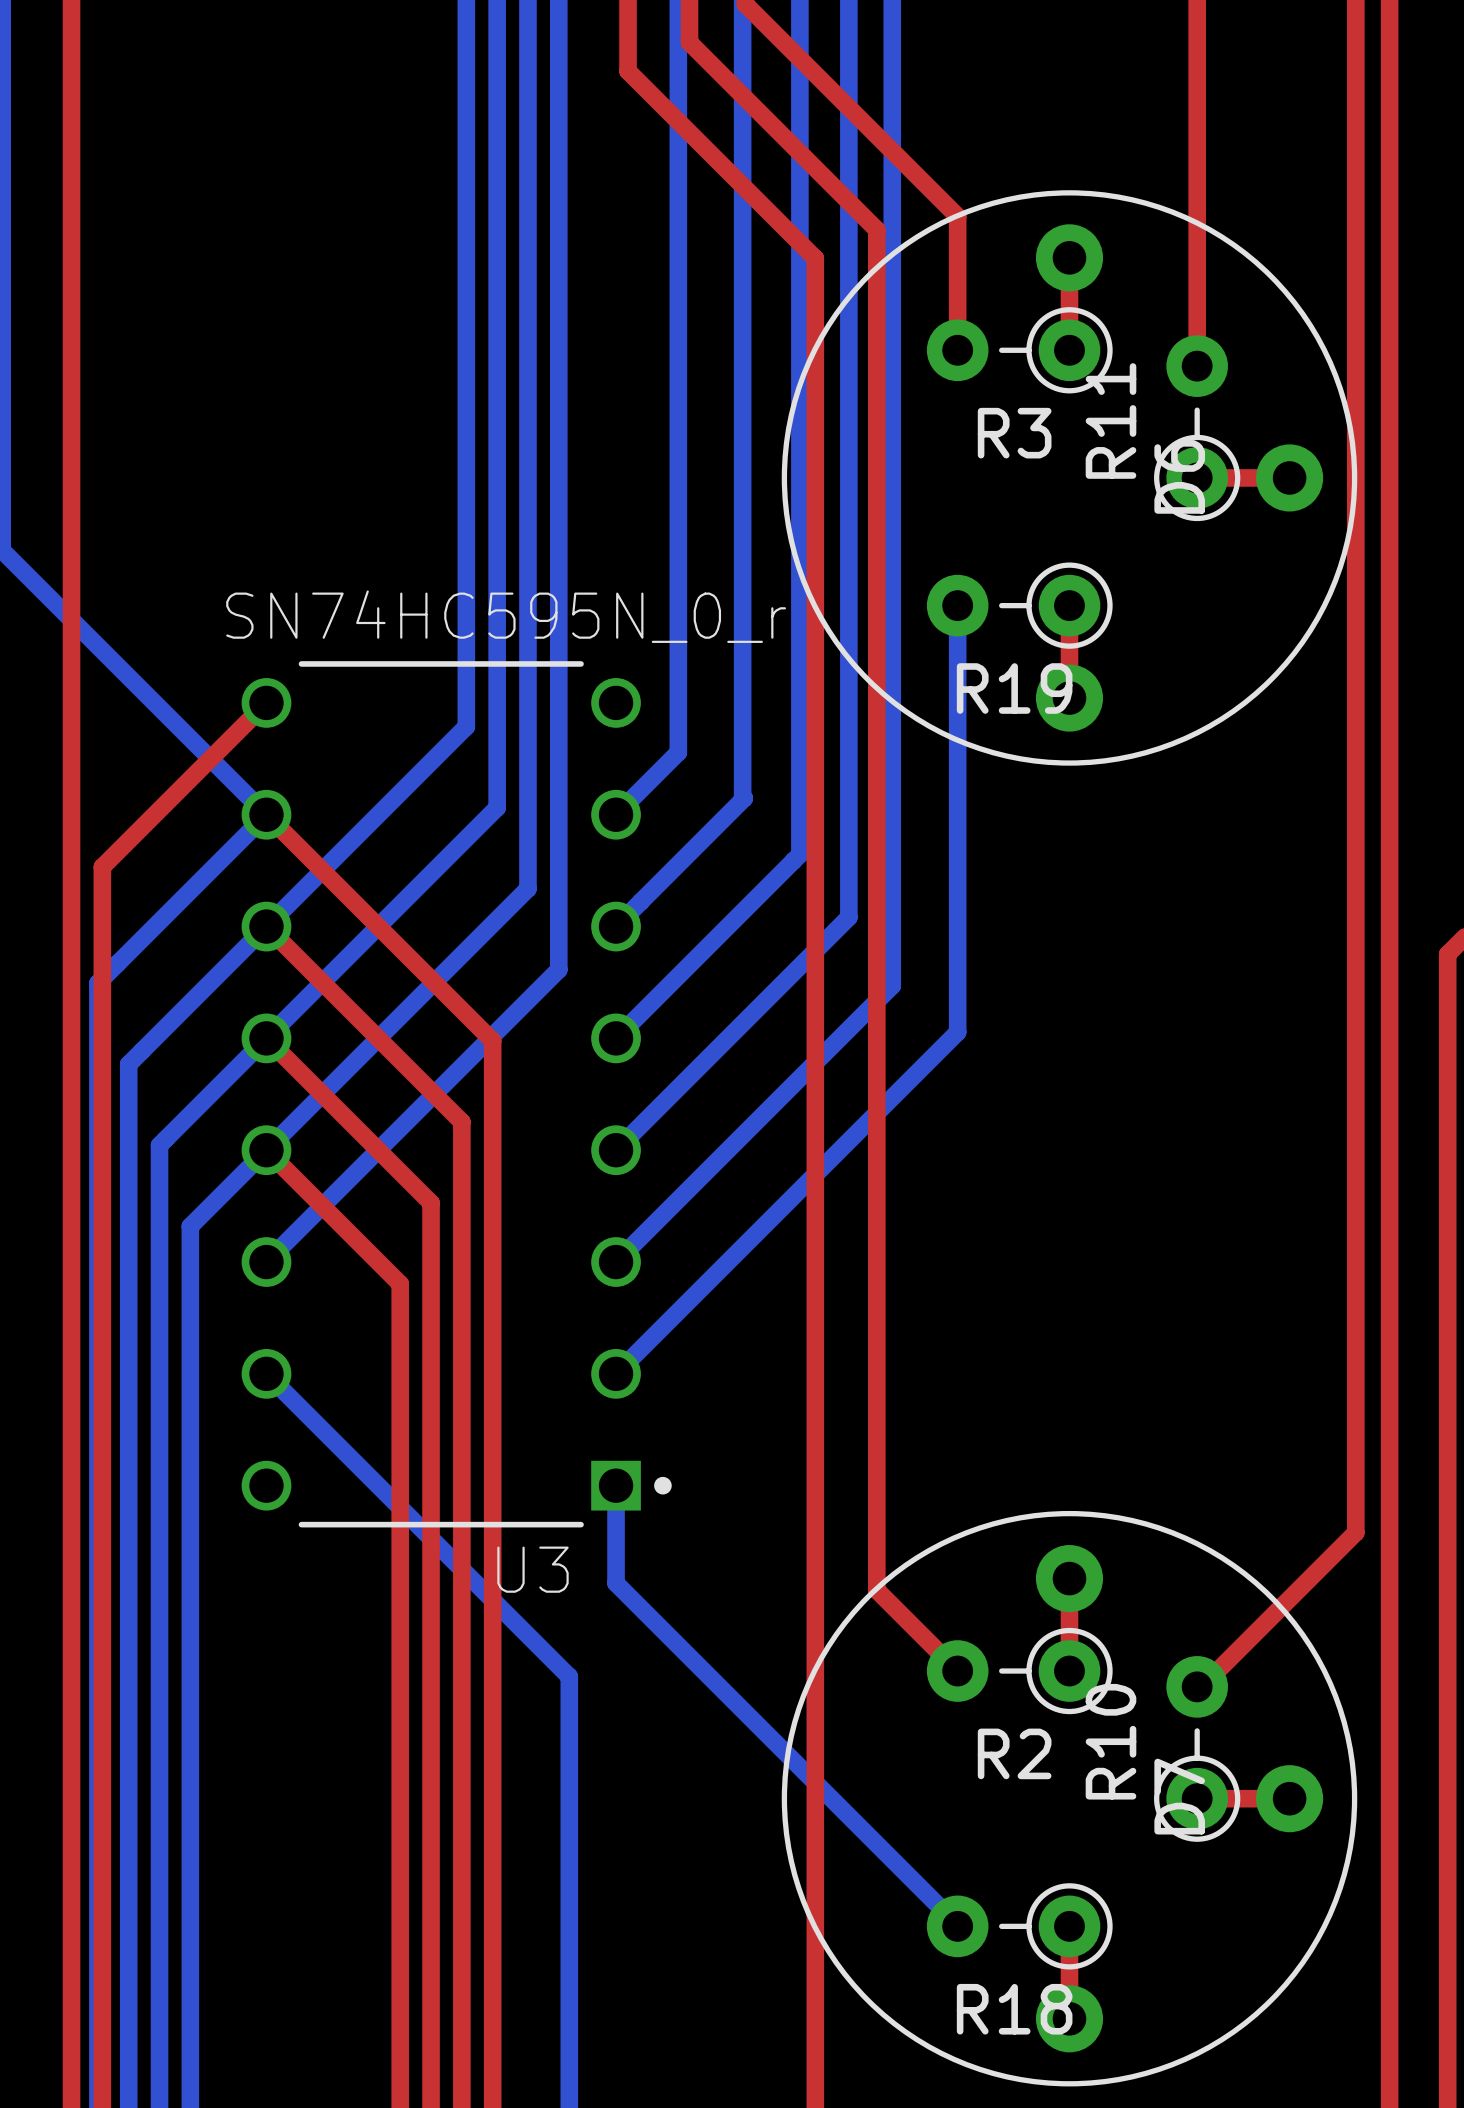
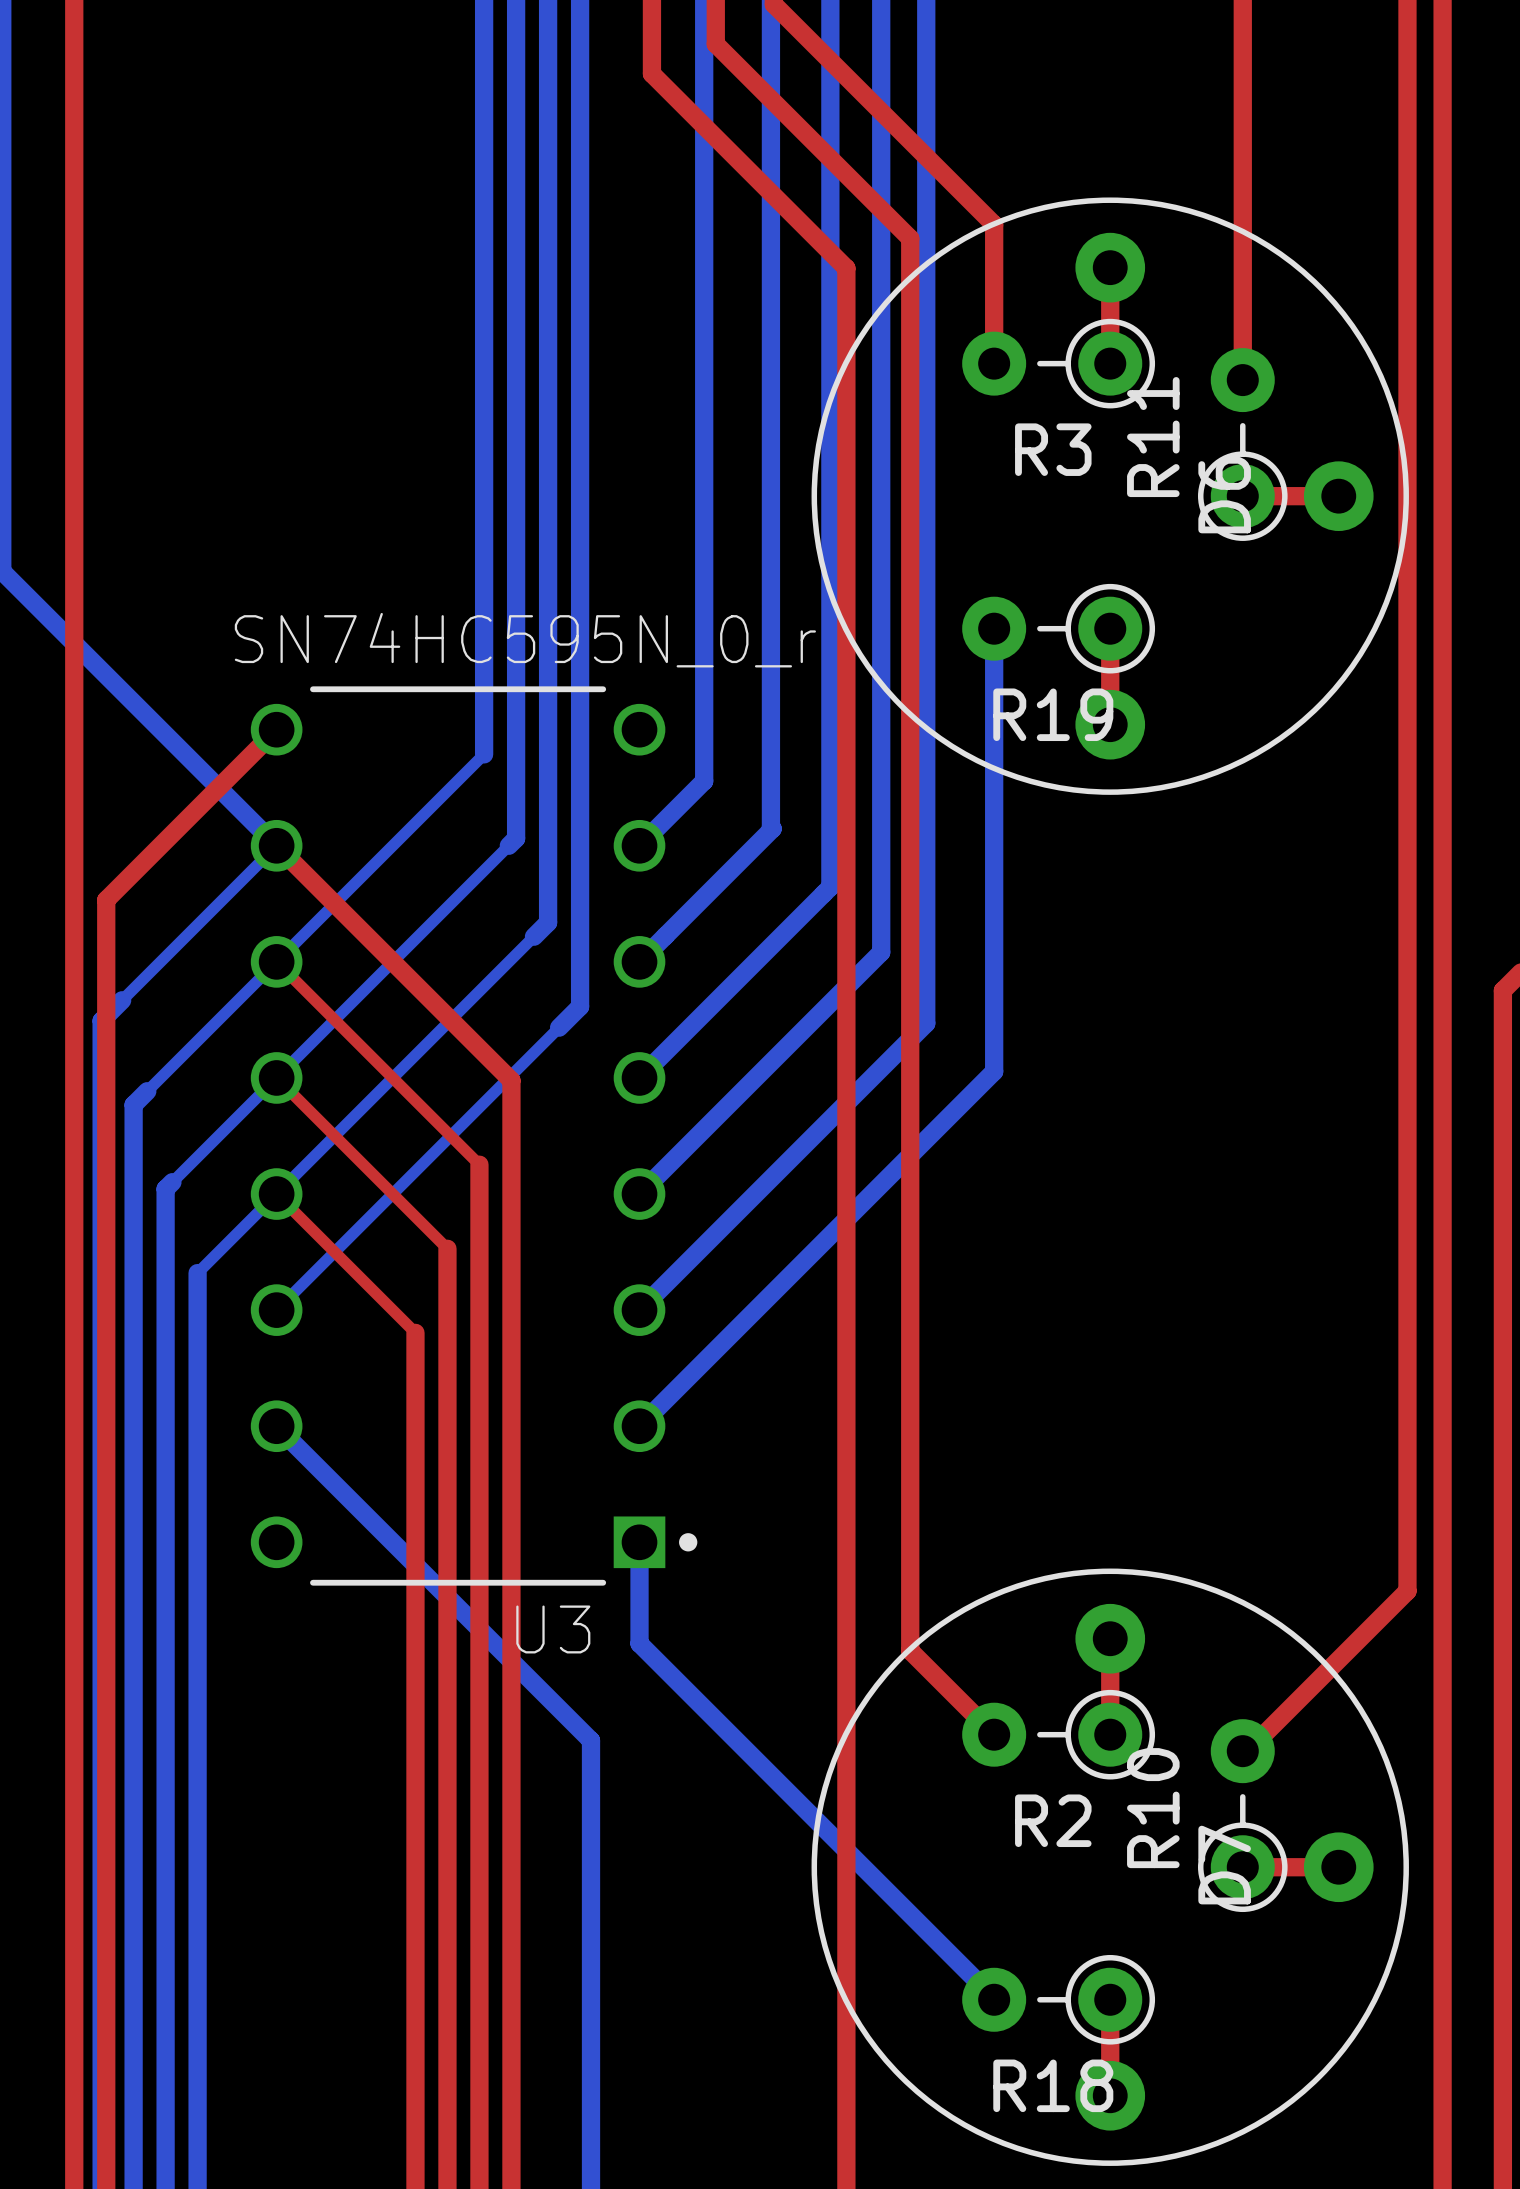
bottom track width: thick (466, 726) (141, 1051) -> thin (484, 754) (147, 1091)
bottom track width: thick (266, 814) (117, 963) -> thin (276, 845) (122, 1000)
bottom track width: thick (490, 814) (166, 1138) -> thin (508, 845) (172, 1182)
bottom track width: thick (514, 902) (190, 1226) -> thin (533, 936) (197, 1273)
top track width: thick (266, 926) (461, 1121) -> thin (276, 961) (479, 1164)
bottom track width: thick (538, 989) (266, 1262) -> thin (559, 1027) (276, 1310)
top track width: thick (266, 1038) (431, 1202) -> thin (276, 1077) (447, 1248)
top track width: thick (266, 1150) (400, 1283) -> thin (276, 1194) (415, 1332)

